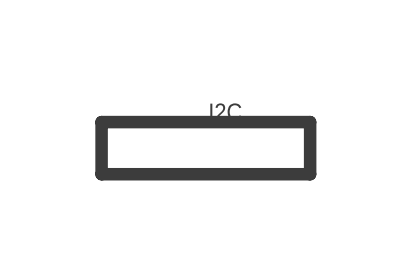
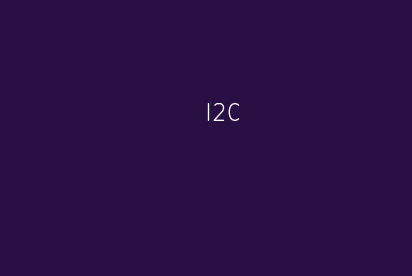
line: (101, 122) (310, 122) (310, 174) (101, 174) (101, 122) -> none

